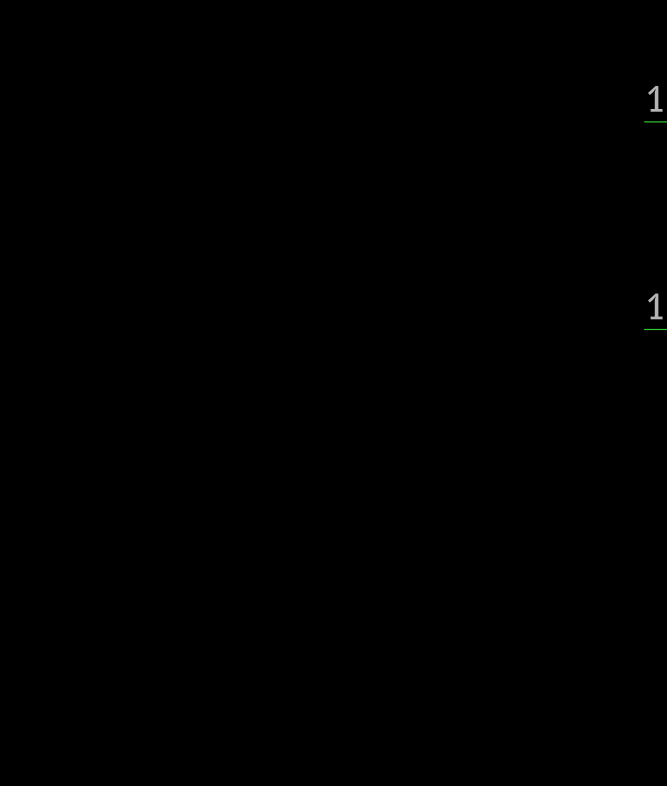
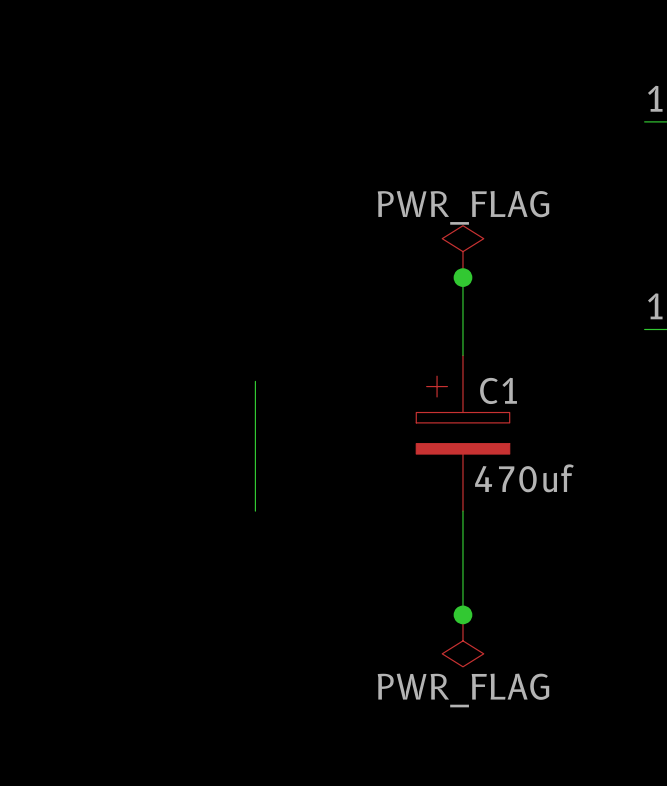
power symbol: none -> PWR_FLAG (462, 251)
wire: none -> (462, 277) (462, 355)
junction: none -> (462, 277)
wire: none -> (255, 381) (255, 511)
C1: none -> 470uf (462, 433)
wire: none -> (462, 511) (462, 614)
junction: none -> (462, 614)
power symbol: none -> PWR_FLAG (462, 640)

